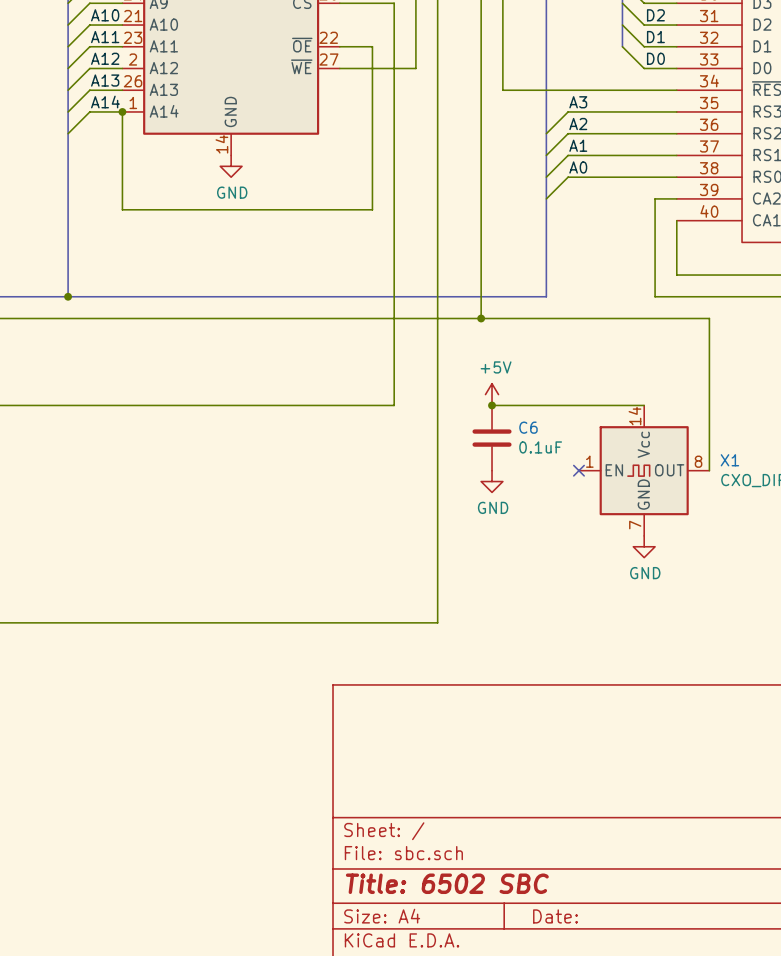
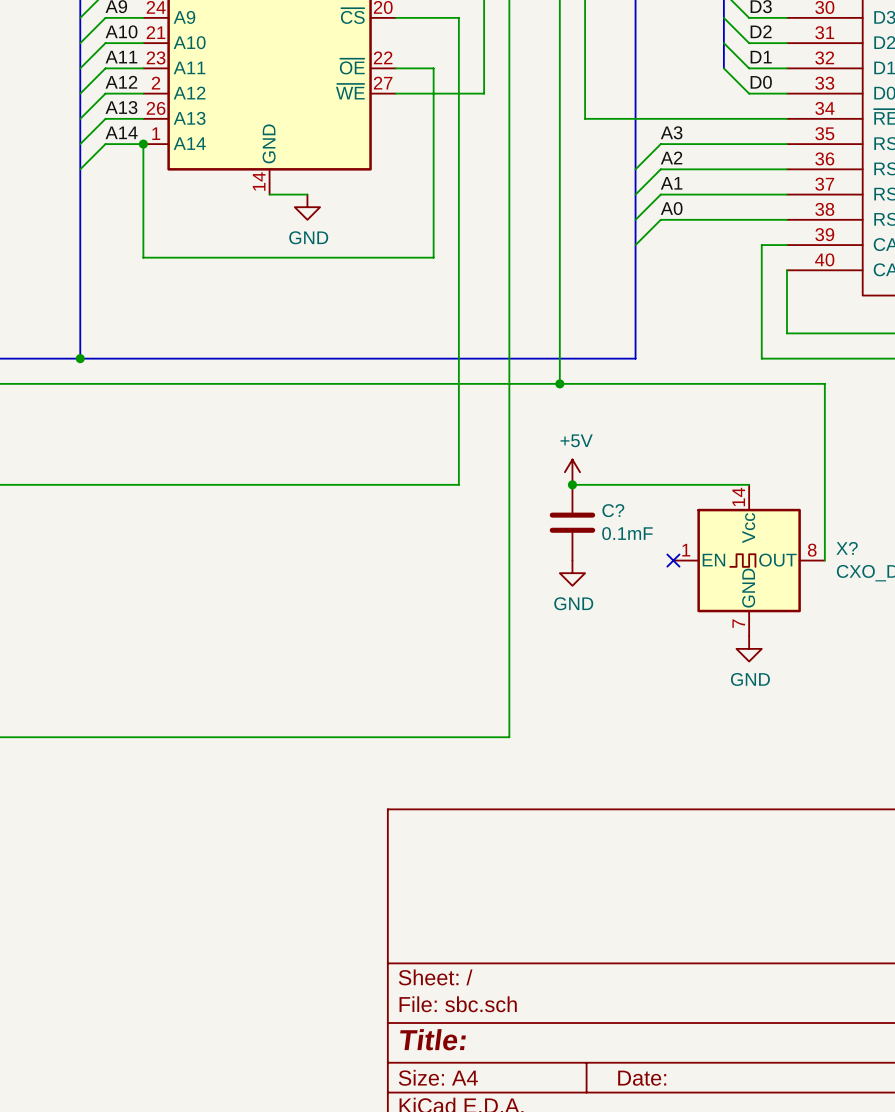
wire: none -> (269, 194) (307, 194)
power symbol position: GND (231, 166) -> GND (307, 207)
C6 name: C6 (528, 427) -> C? (613, 510)
C6 value: 0.1uF (540, 447) -> 0.1mF (627, 533)
X1 name: X1 (729, 460) -> X? (847, 548)
title block: Title: 6502 SBC (447, 883) -> Title: (433, 1039)

